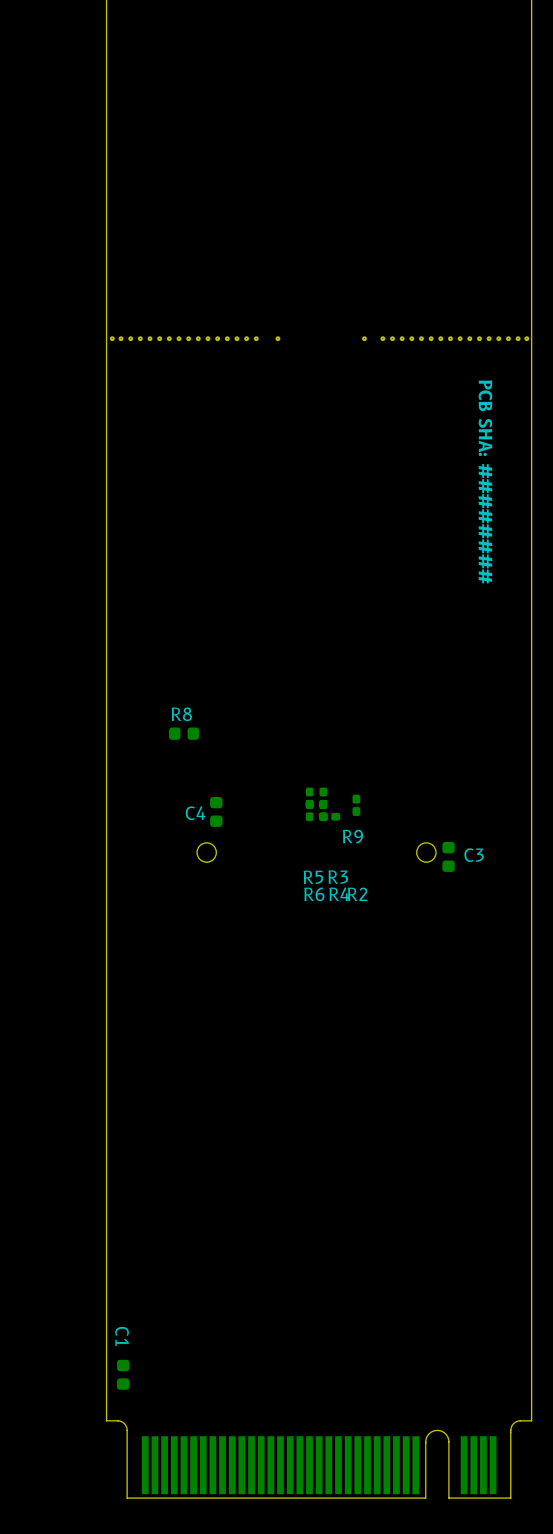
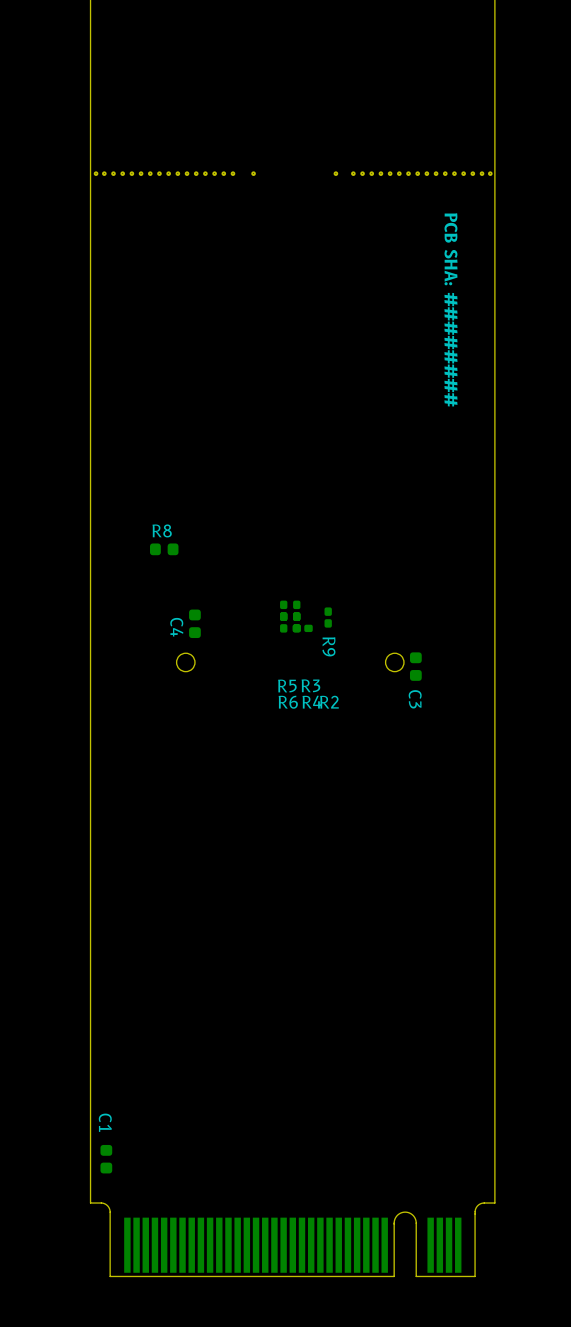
C4 name rotation: 0° (195, 813) -> 90° clockwise (176, 627)
R9 name rotation: 0° (352, 836) -> 90° clockwise (328, 646)
C3 name rotation: 0° (474, 855) -> 90° clockwise (415, 699)
C3 name position: C3 (474, 855) -> C3 (415, 699)

